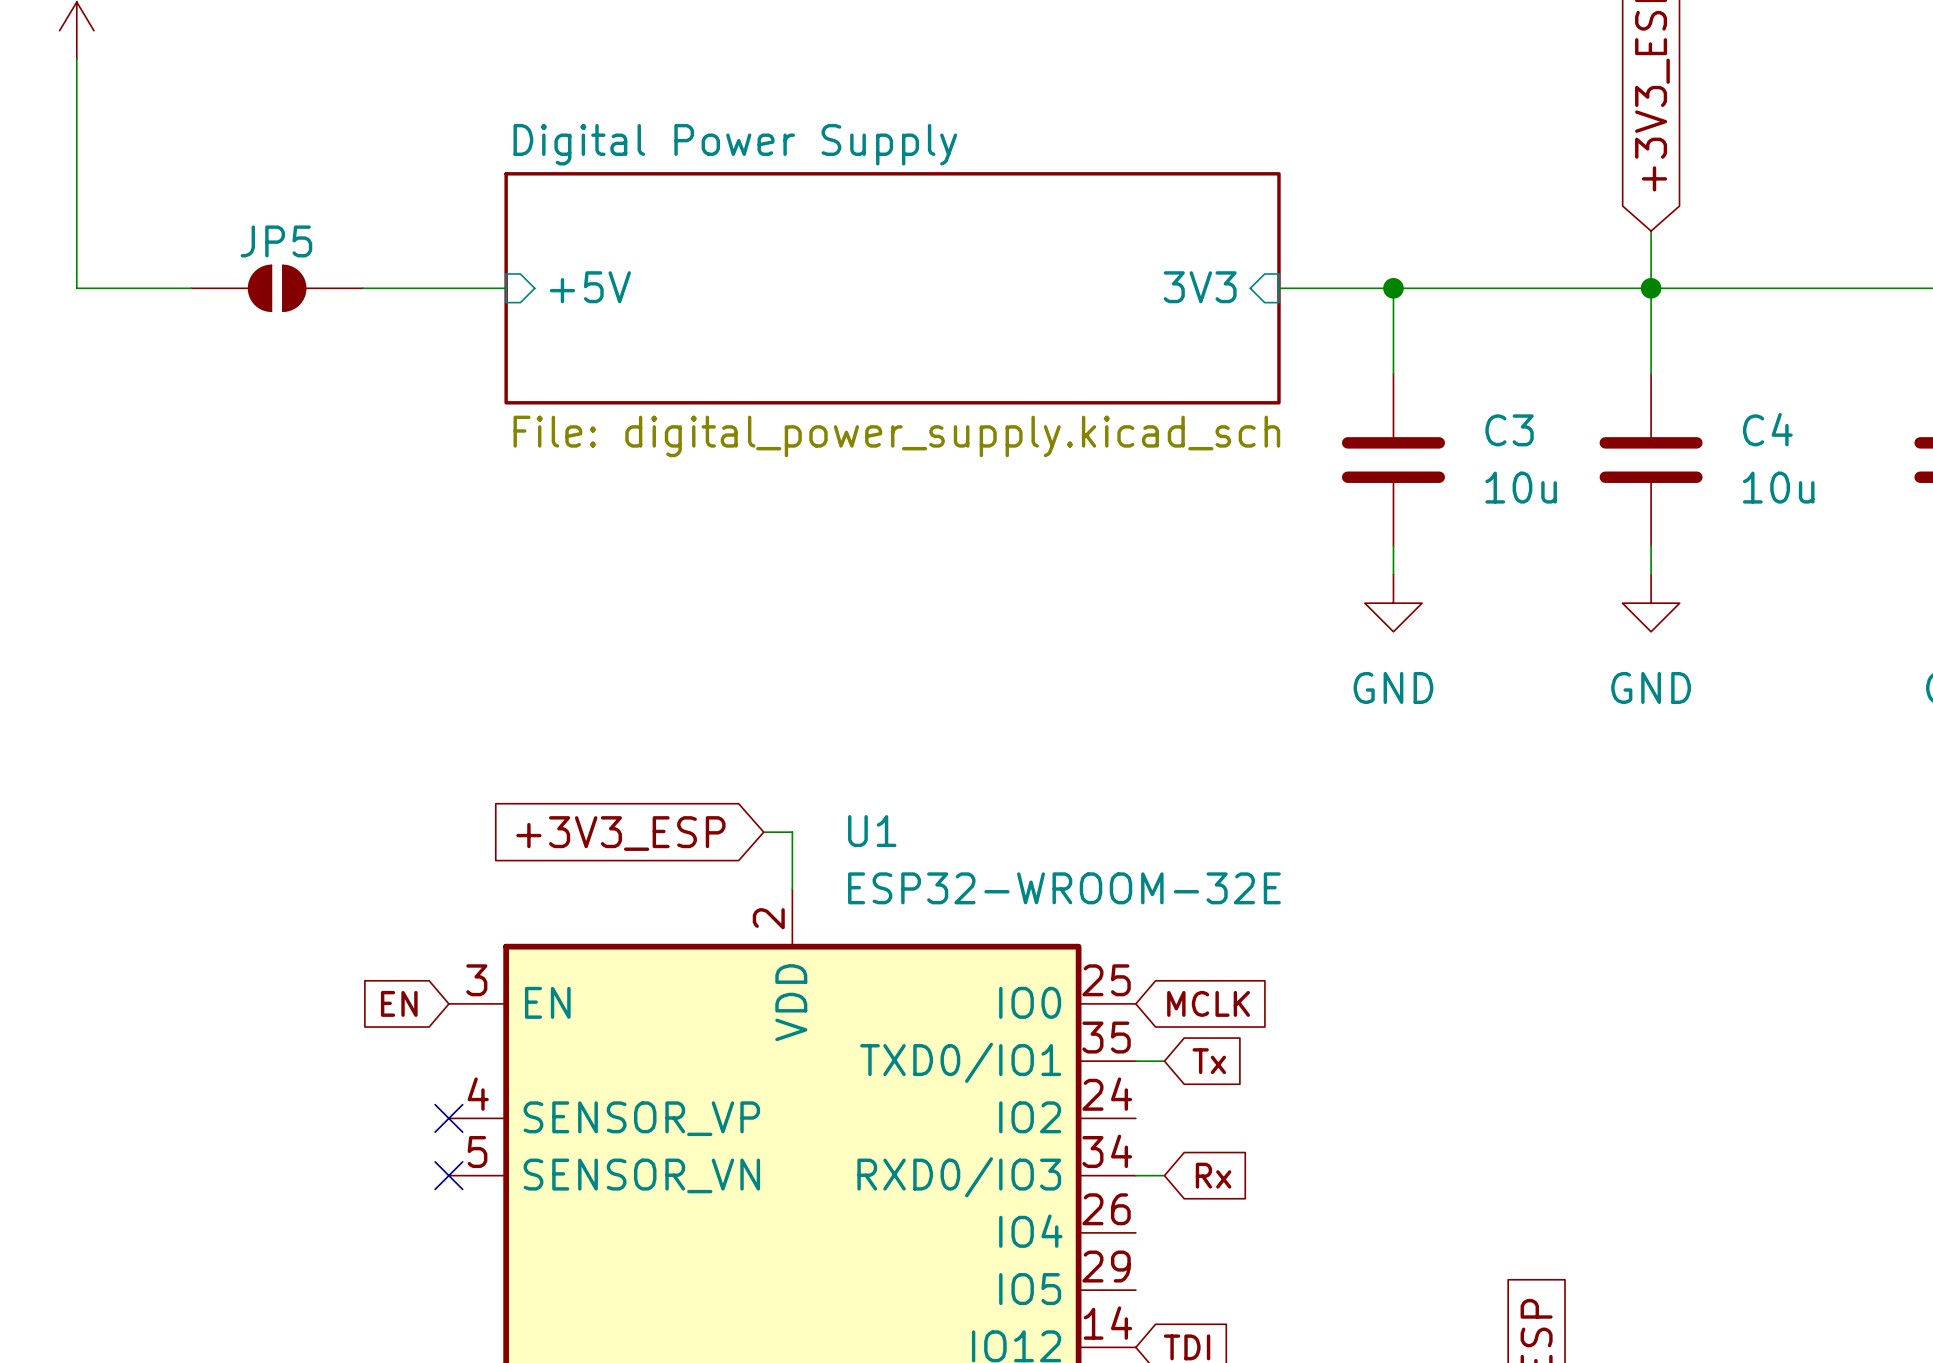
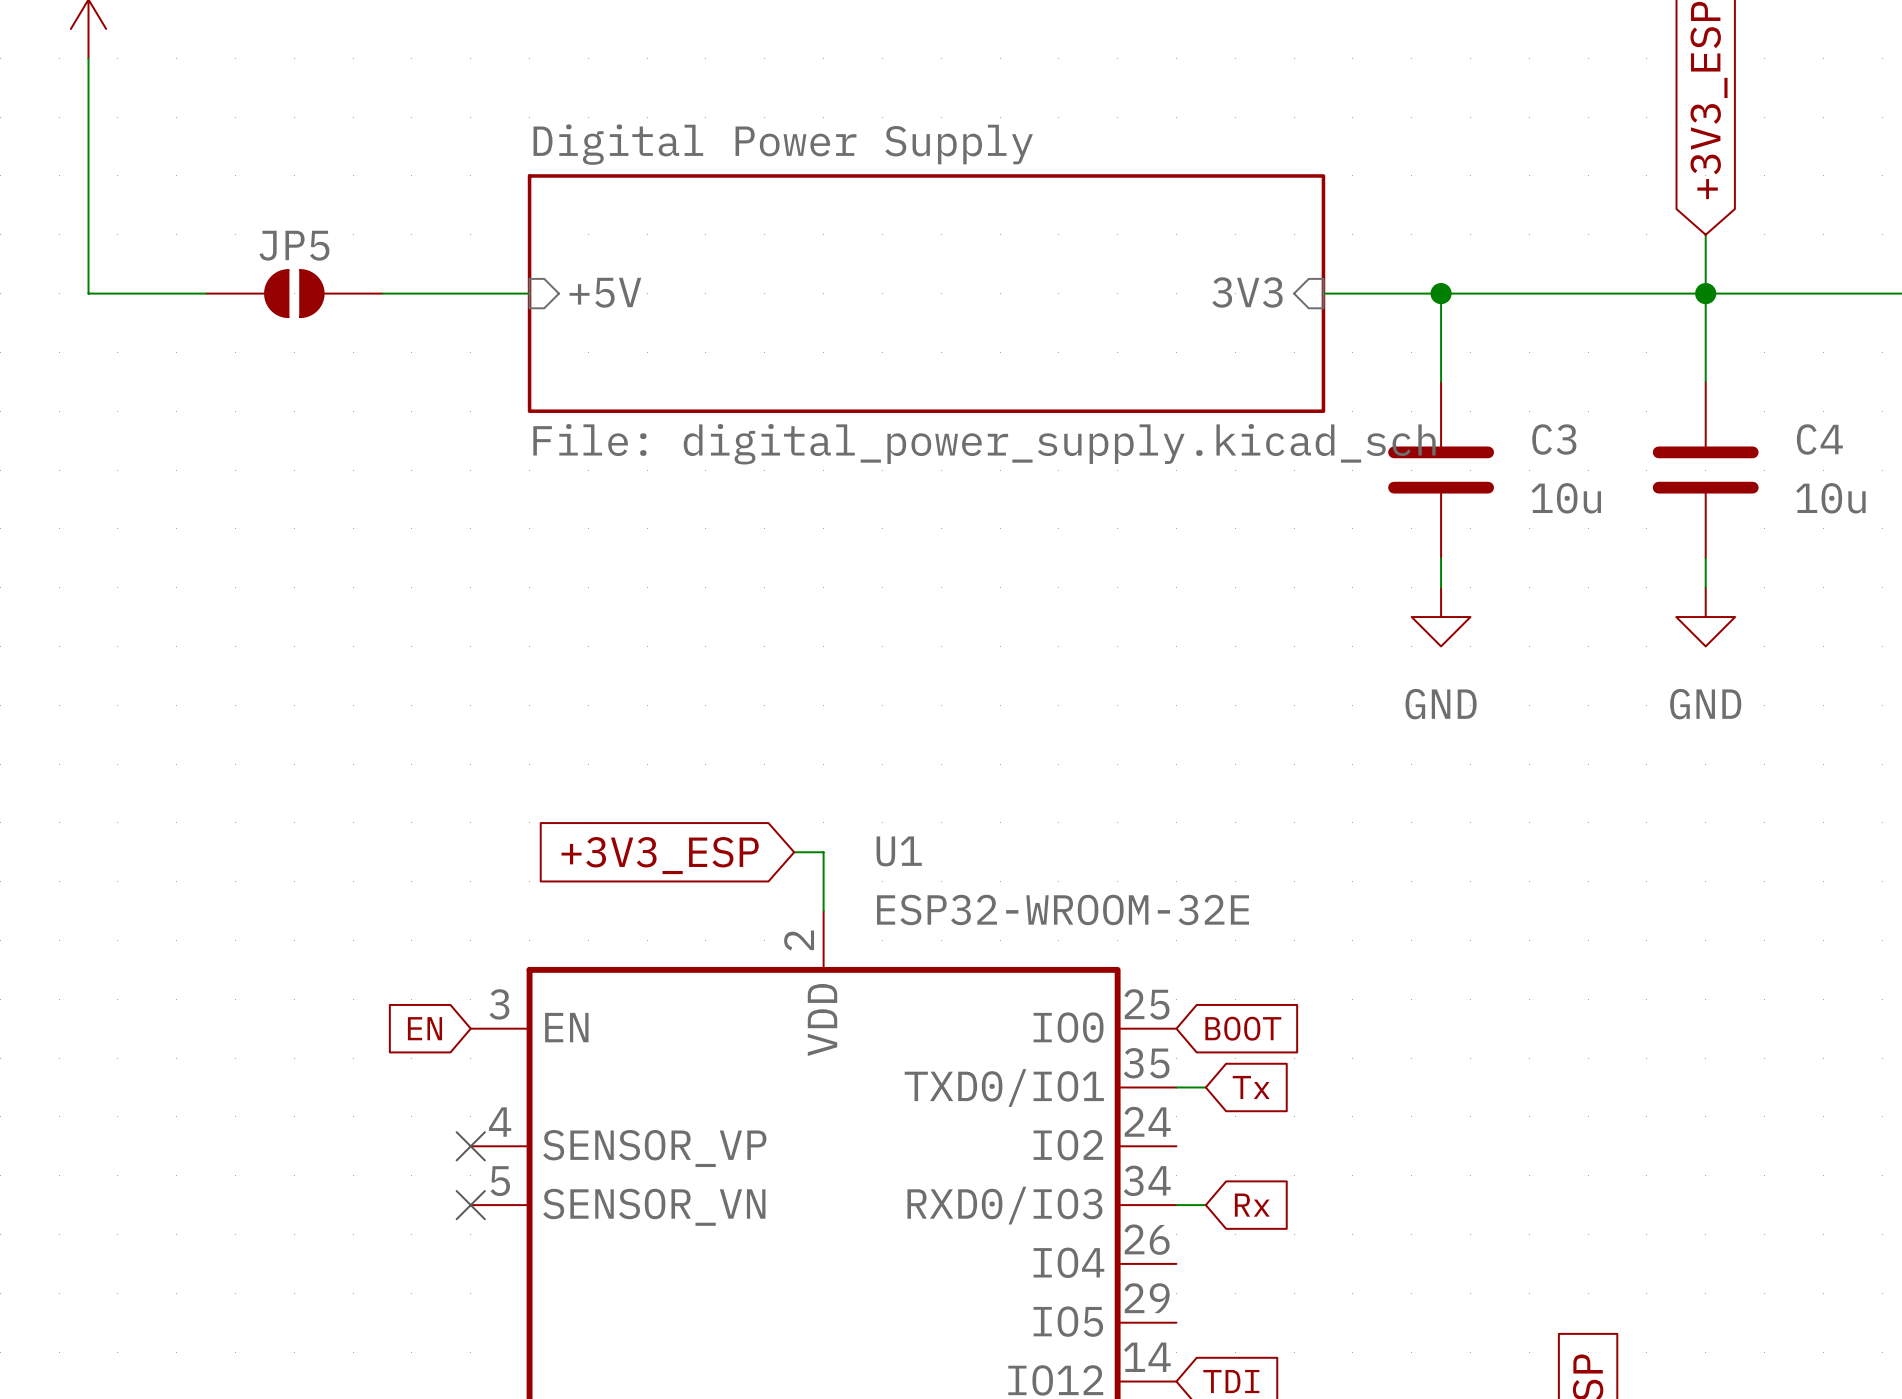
global label: MCLK (1208, 1003) -> BOOT (1243, 1028)

